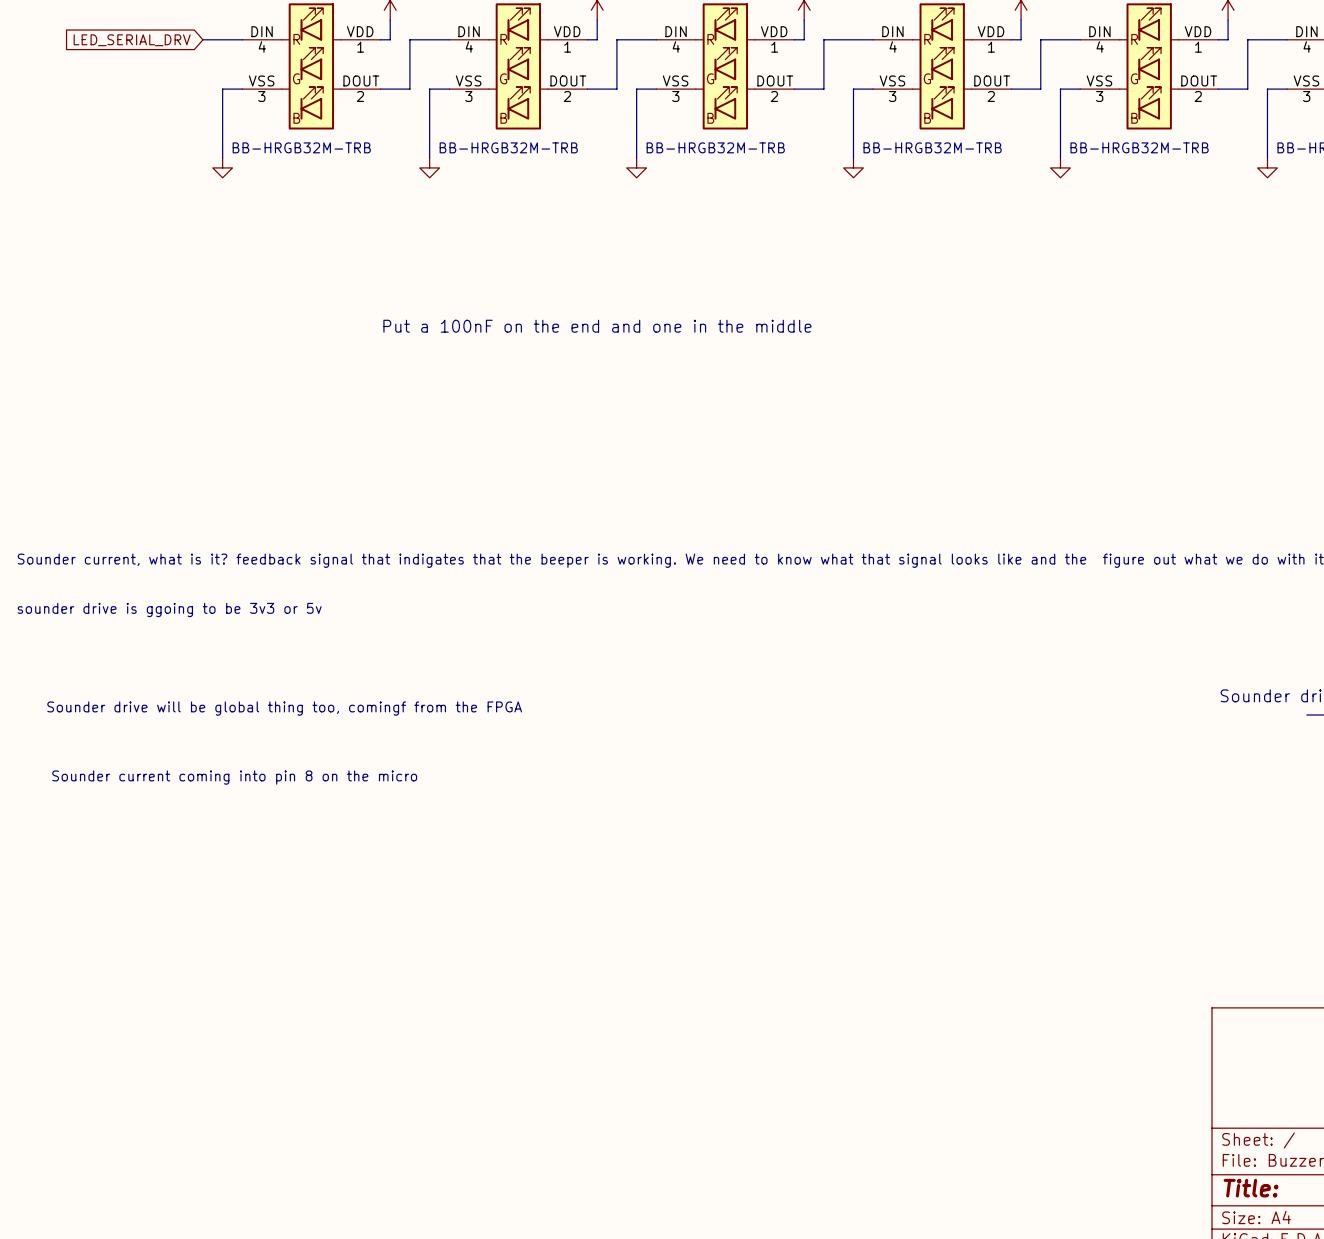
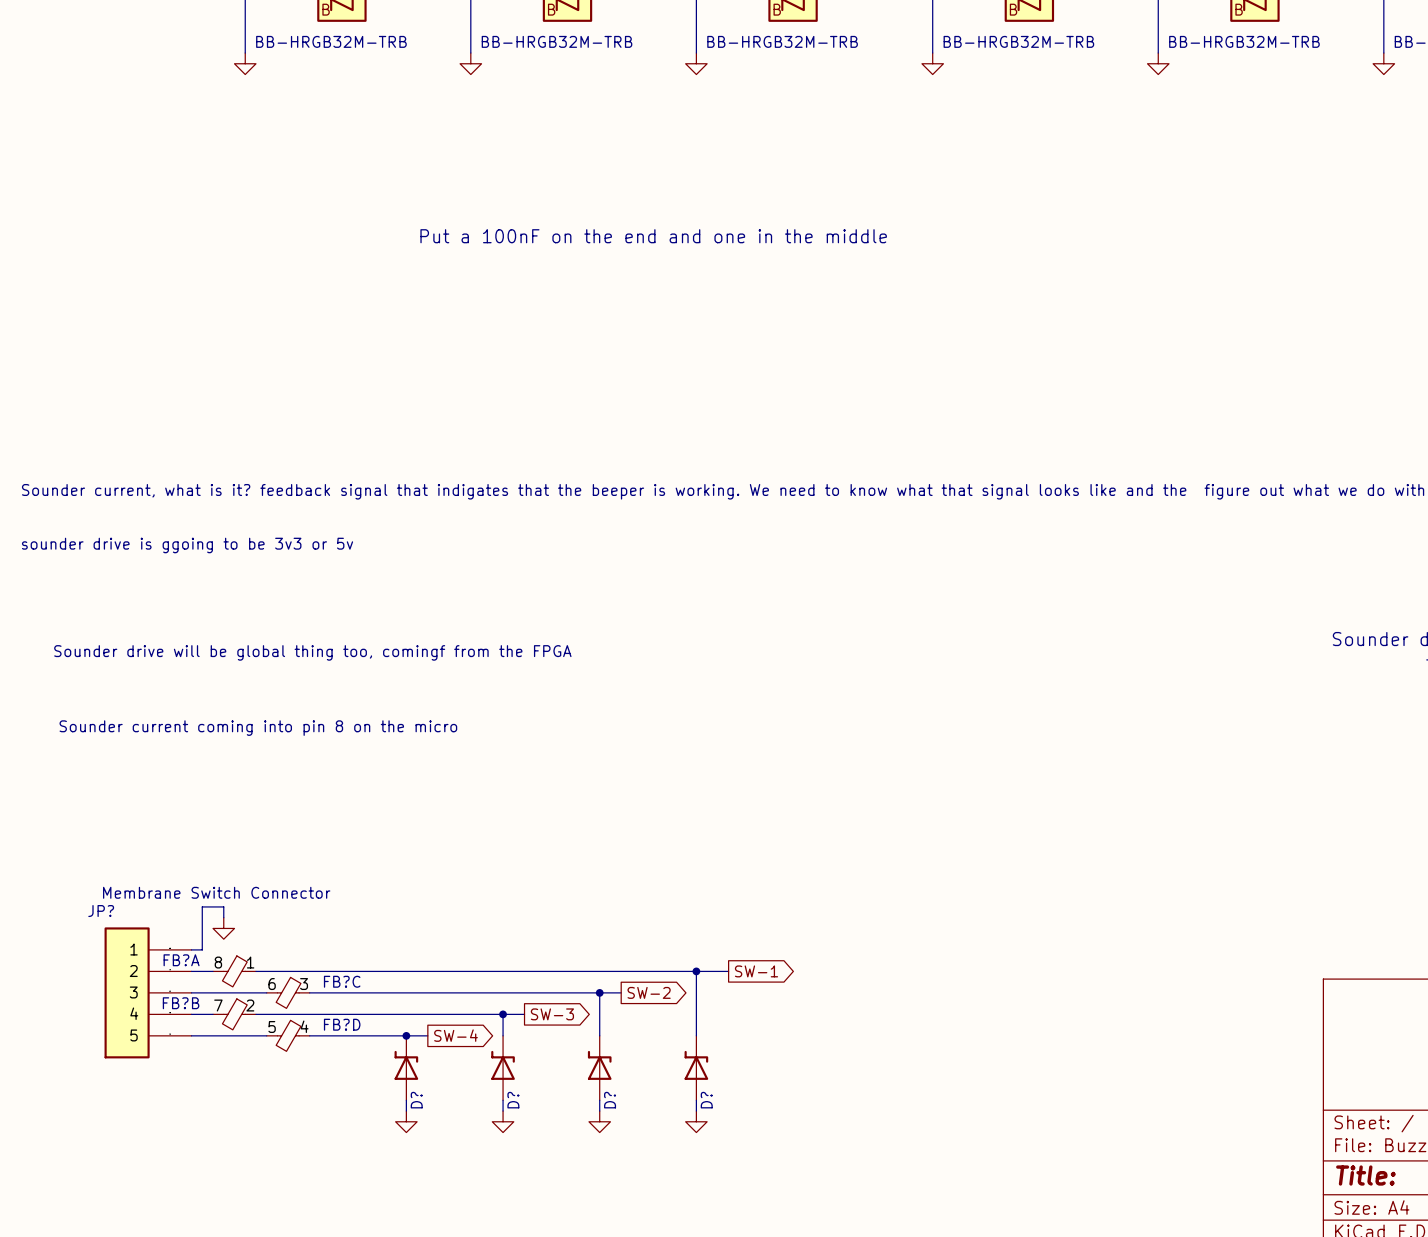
text: none -> Membrane Switch Connector (216, 892)
wire: none -> (223, 917) (223, 906) (202, 906) (202, 949) (191, 949)
power symbol: none -> (223, 928)
wire: none -> (191, 971) (213, 971)
FB?A: none -> (234, 971)
wire: none -> (255, 971) (728, 971)
wire: none -> (696, 971) (696, 1035)
junction: none -> (696, 971)
global label: none -> SW-1 (756, 971)
JP?: none -> (148, 992)
wire: none -> (191, 992) (266, 992)
FB?C: none -> (288, 992)
wire: none -> (309, 992) (621, 992)
wire: none -> (599, 992) (599, 1035)
junction: none -> (599, 992)
global label: none -> SW-2 (649, 992)
wire: none -> (191, 1014) (213, 1014)
FB?B: none -> (234, 1014)
wire: none -> (255, 1014) (524, 1014)
wire: none -> (503, 1014) (503, 1035)
junction: none -> (503, 1014)
global label: none -> SW-3 (552, 1014)
wire: none -> (191, 1035) (266, 1035)
FB?D: none -> (288, 1035)
wire: none -> (309, 1035) (427, 1035)
junction: none -> (406, 1035)
global label: none -> SW-4 (456, 1035)
D?: none -> (406, 1068)
D?: none -> (503, 1068)
D?: none -> (599, 1068)
D?: none -> (696, 1068)
wire: none -> (406, 1100) (406, 1111)
wire: none -> (503, 1100) (503, 1111)
wire: none -> (599, 1100) (599, 1111)
wire: none -> (696, 1100) (696, 1111)
power symbol: none -> (406, 1121)
power symbol: none -> (503, 1121)
power symbol: none -> (599, 1121)
power symbol: none -> (696, 1121)

